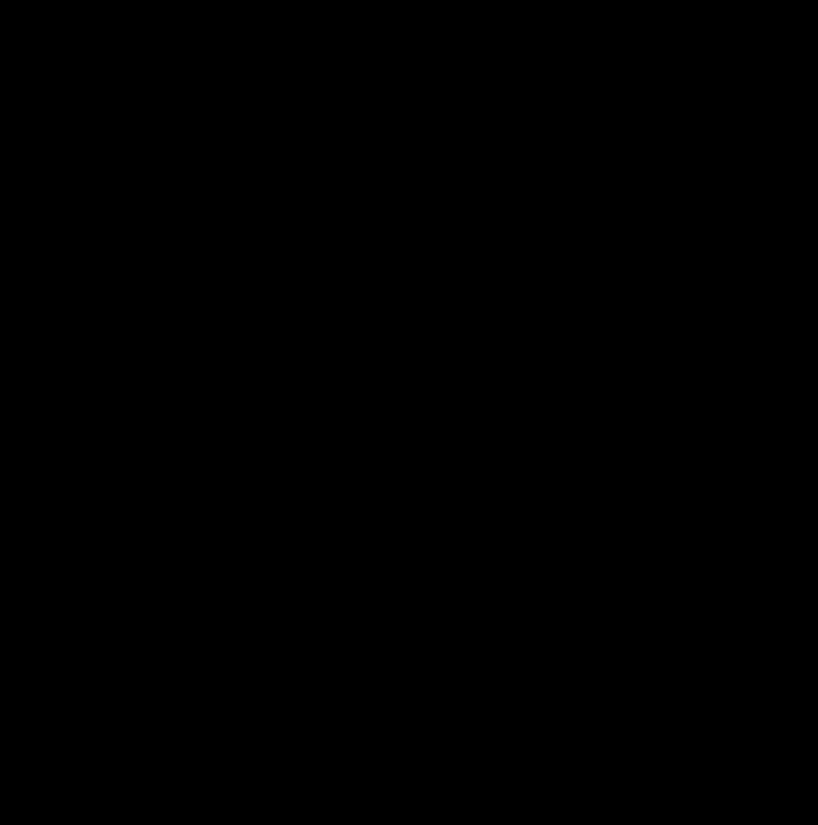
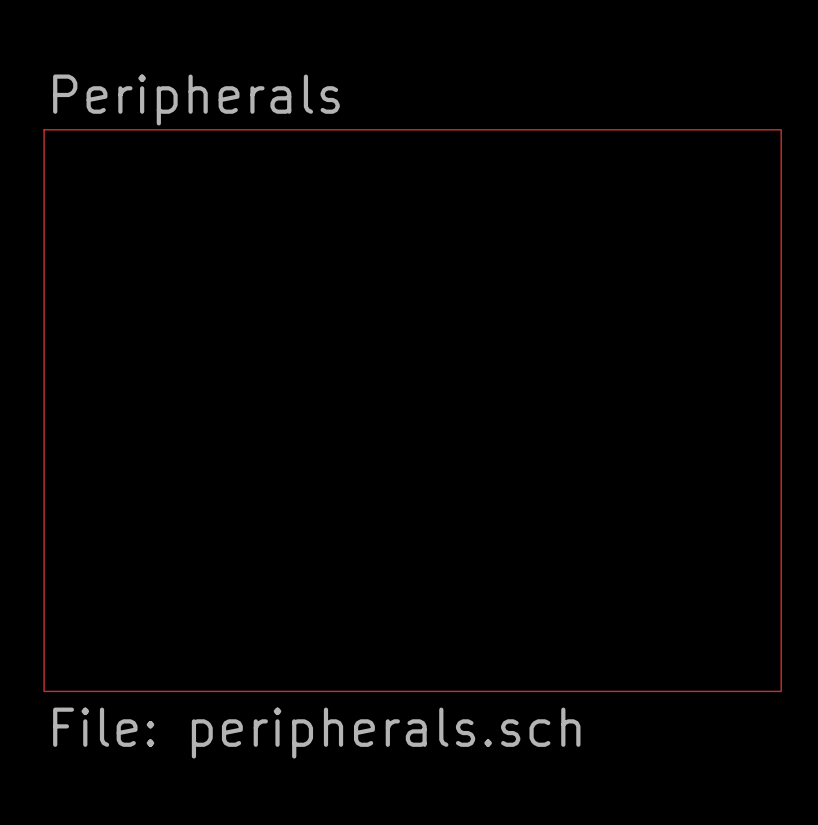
sheet Peripherals: none -> File: peripherals.sch (412, 410)

